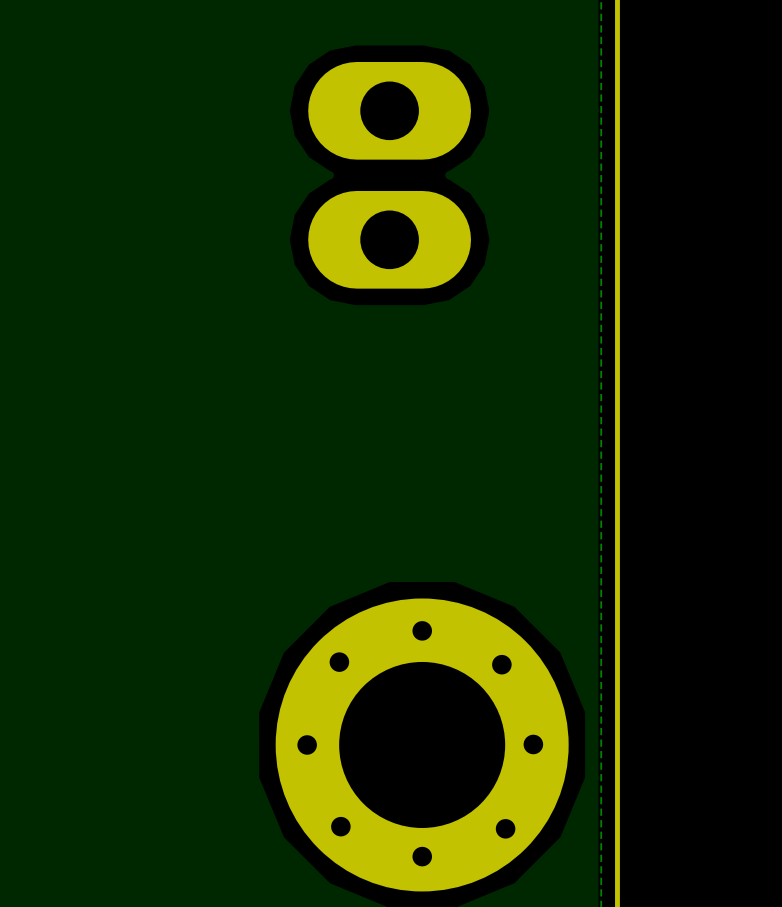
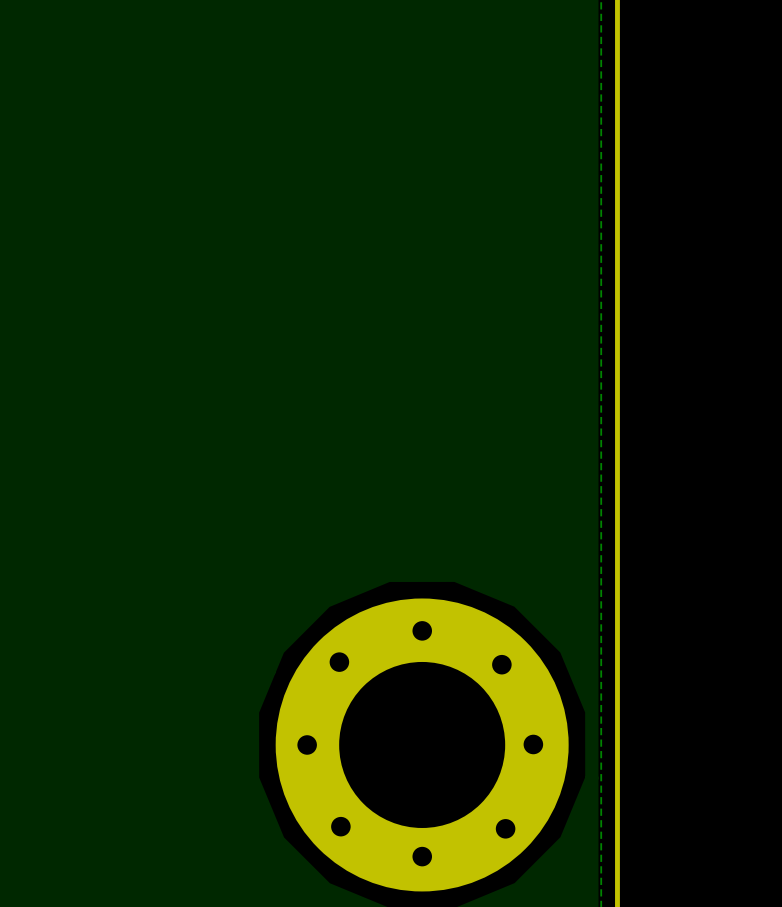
part: (389, 175) -> none

